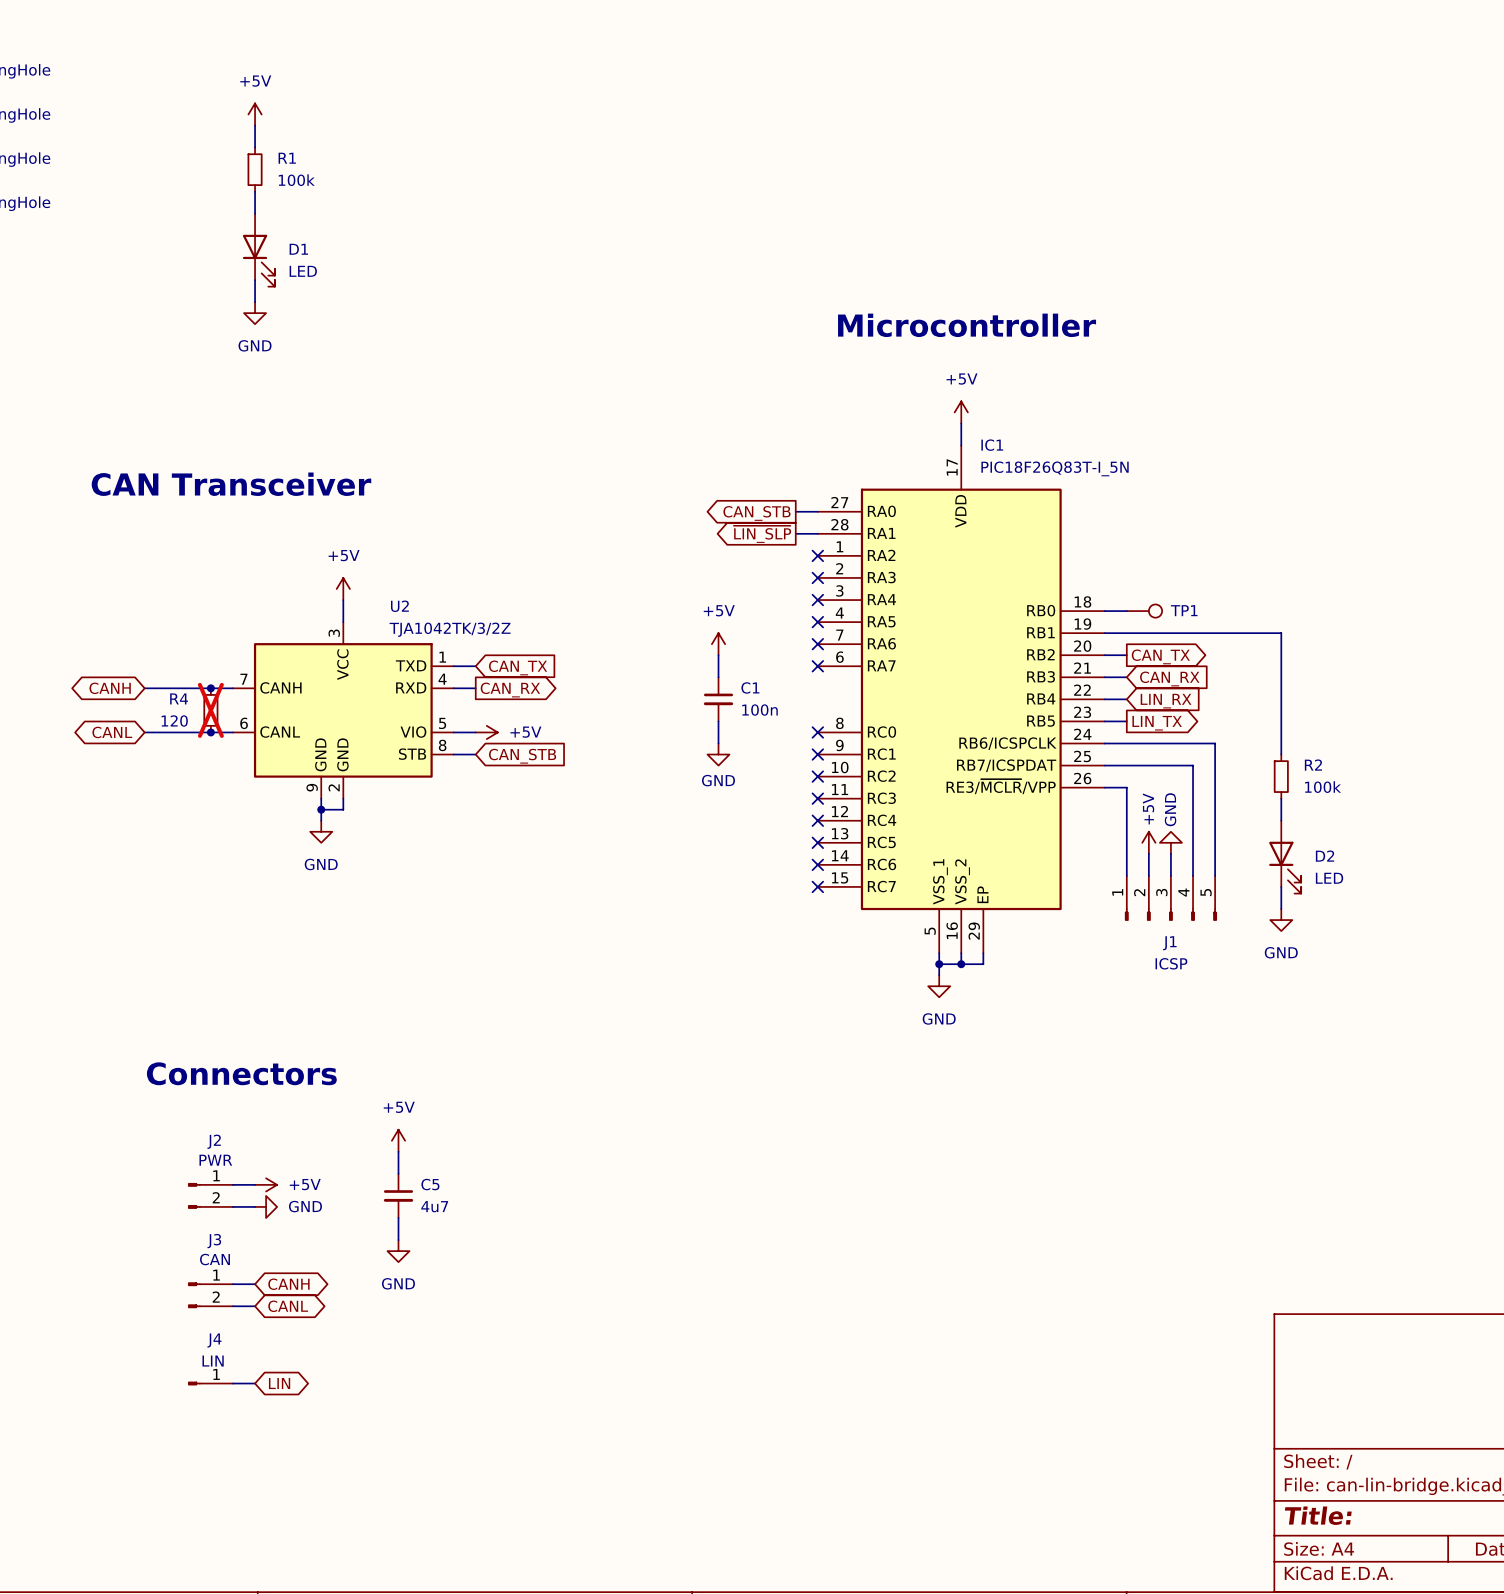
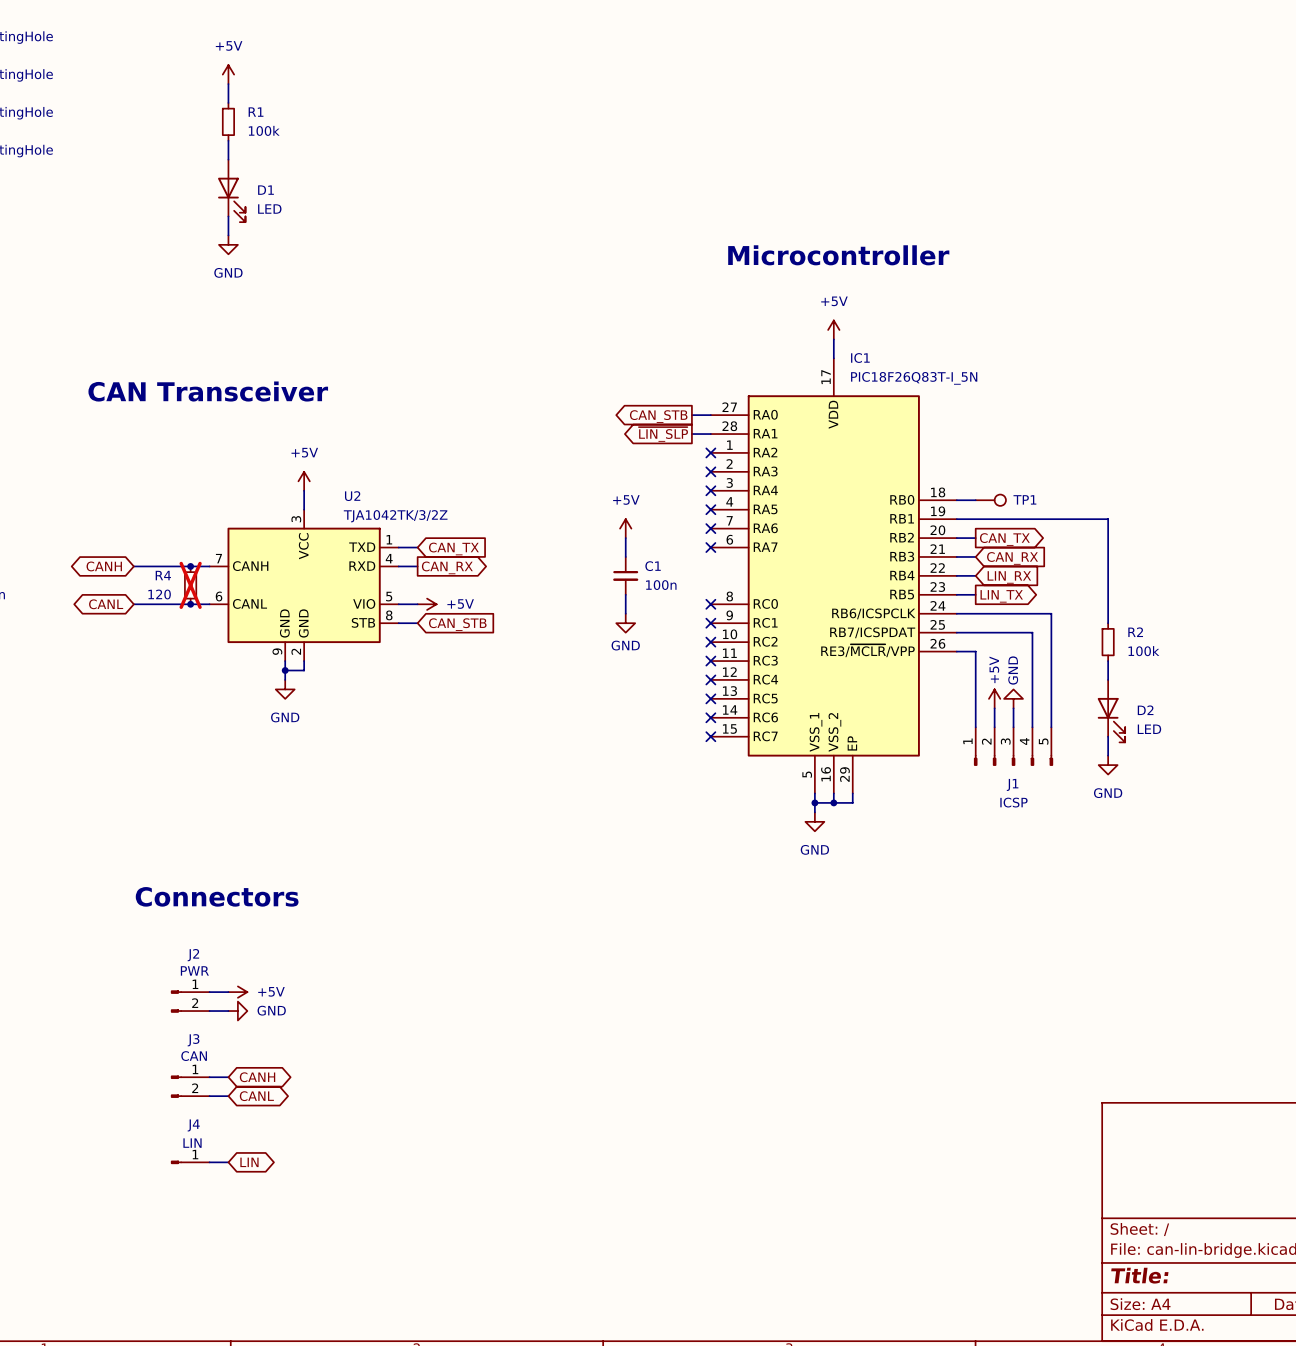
power symbol: +5V (398, 1140) -> none
wire: (398, 1151) (398, 1173) -> none
C5: 4u7 (398, 1195) -> none
wire: (398, 1218) (398, 1240) -> none
power symbol: GND (398, 1251) -> none

